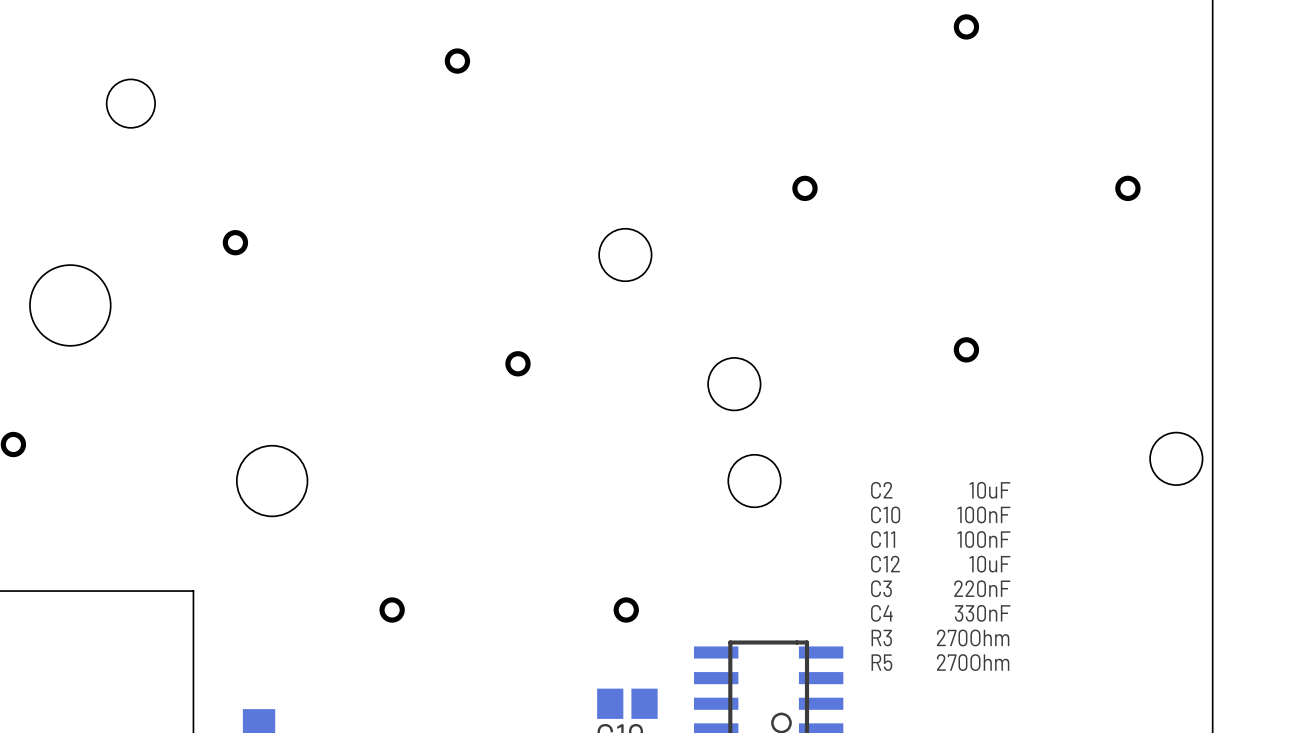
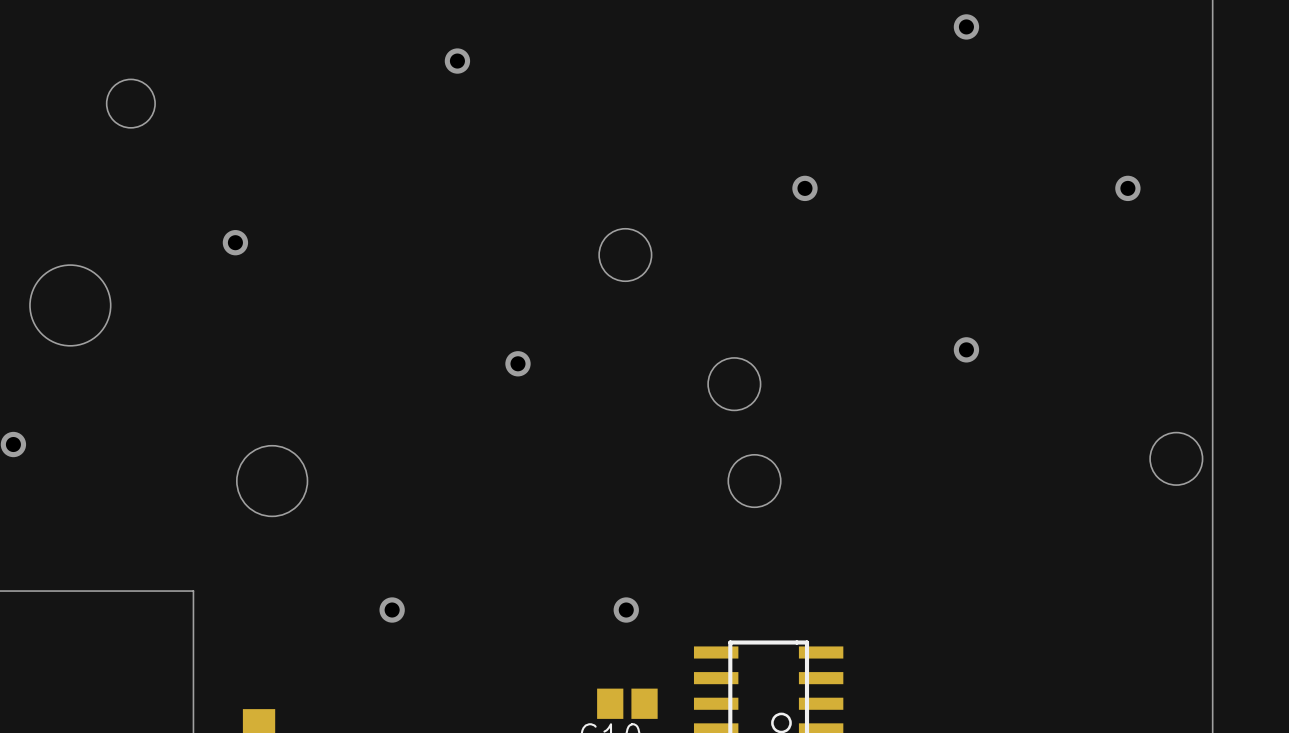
text: C2 (881, 490) -> none
text: 10uF (989, 490) -> none
text: C10 (885, 514) -> none
text: 100nF (983, 514) -> none
text: C11 (883, 539) -> none
text: 100nF (983, 539) -> none
text: C12 (885, 564) -> none
text: 10uF (989, 564) -> none
text: C3 (881, 588) -> none
text: 220nF (982, 588) -> none
text: C4 (881, 613) -> none
text: 330nF (982, 613) -> none
text: 270Ohm (973, 637) -> none
text: R3 (881, 638) -> none
text: R5 (881, 662) -> none
text: 270Ohm (973, 662) -> none

